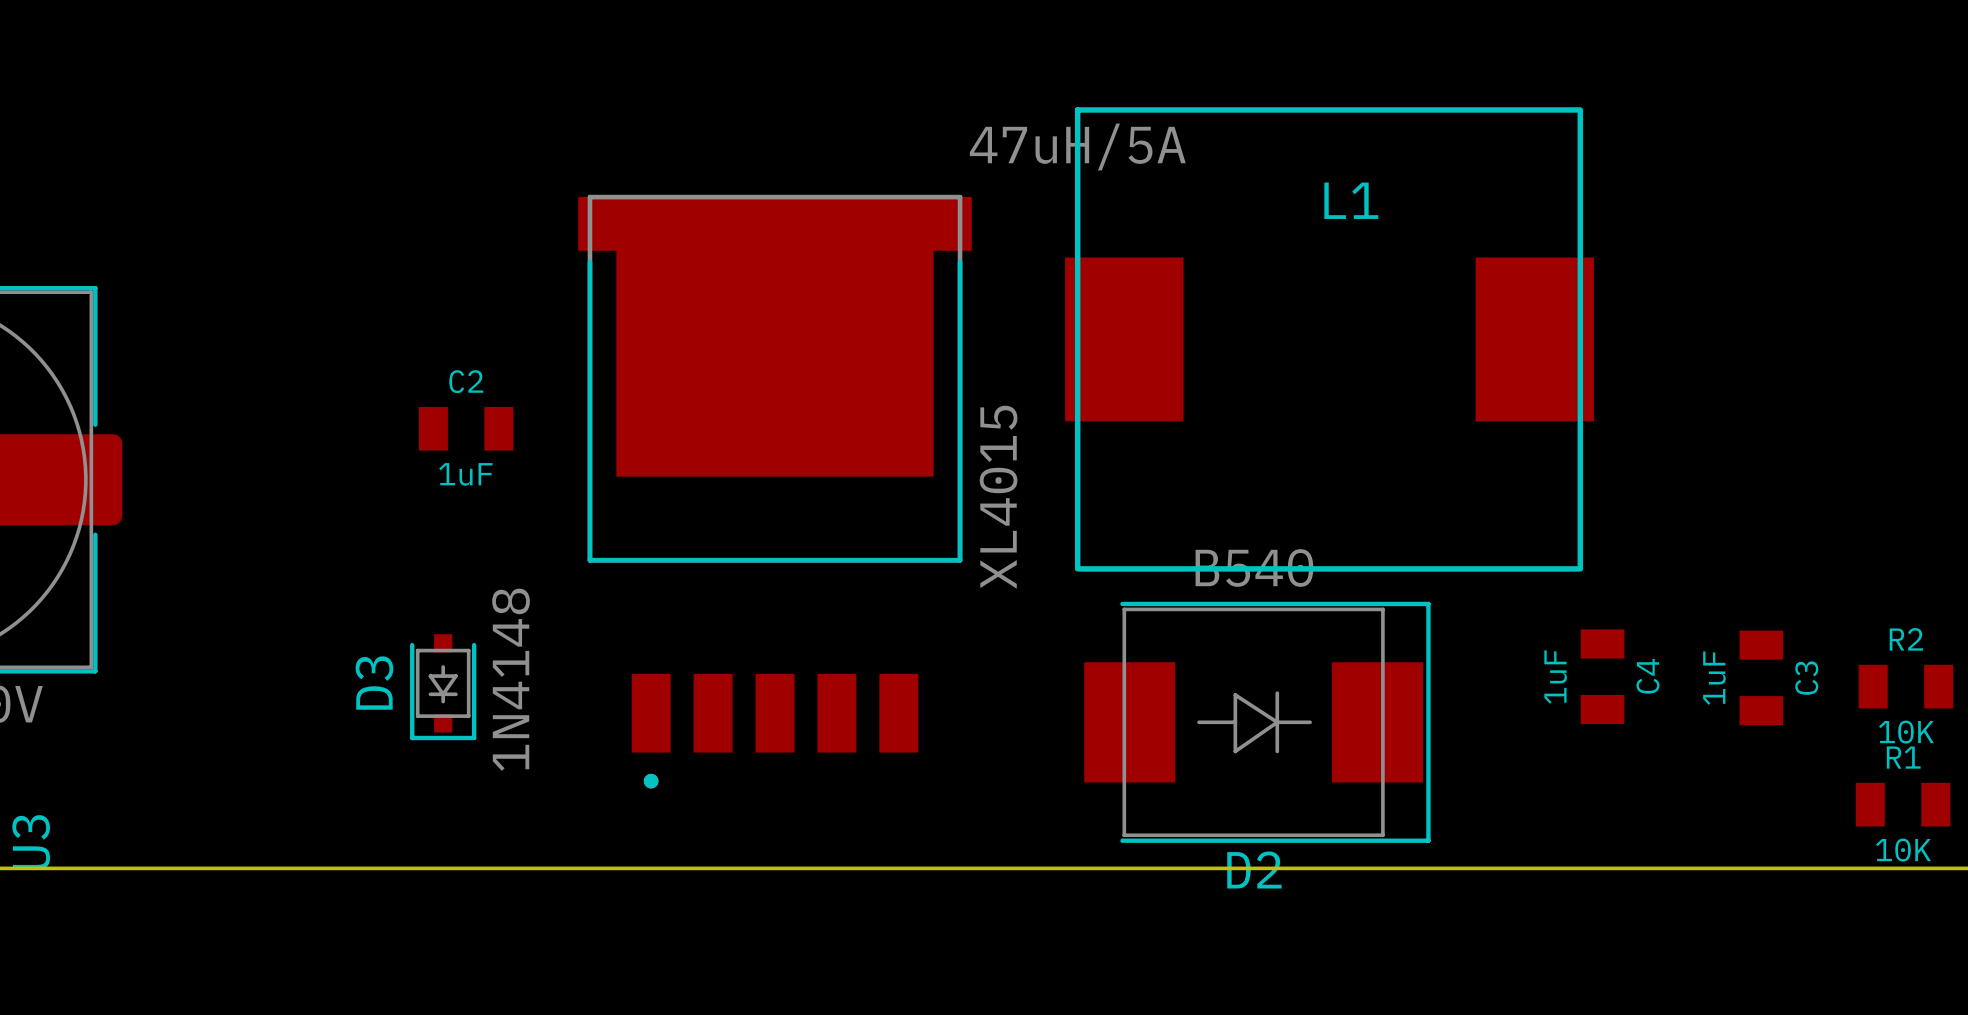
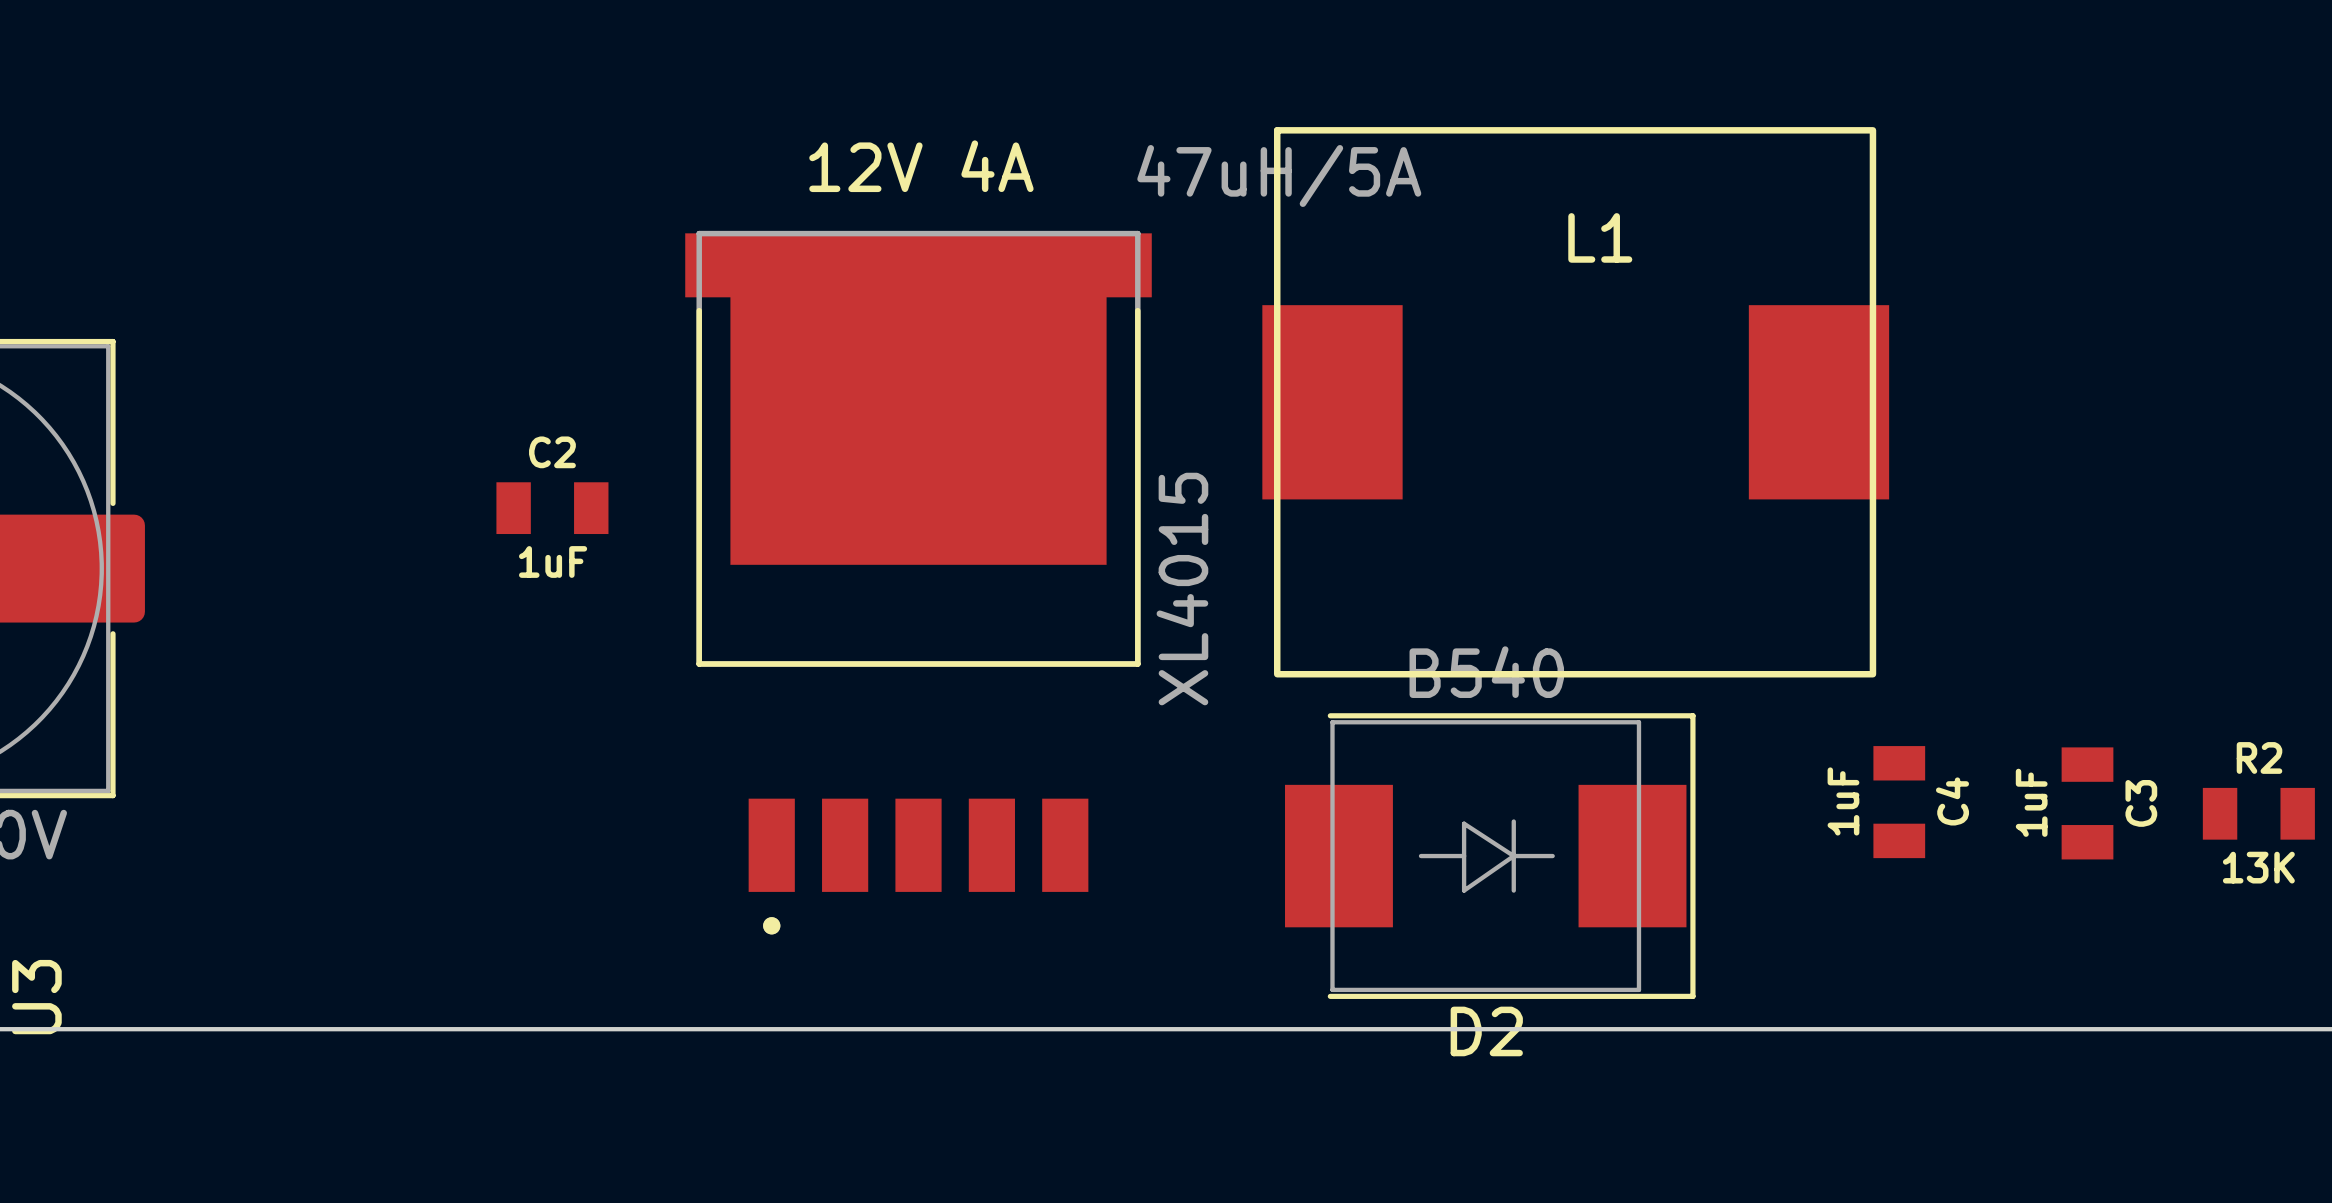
text: none -> 12V 4A (921, 166)
D3: 1N4148 (443, 687) -> none
R2 value: 10K (1906, 732) -> 13K (2258, 867)
R1: 10K (1903, 804) -> none

